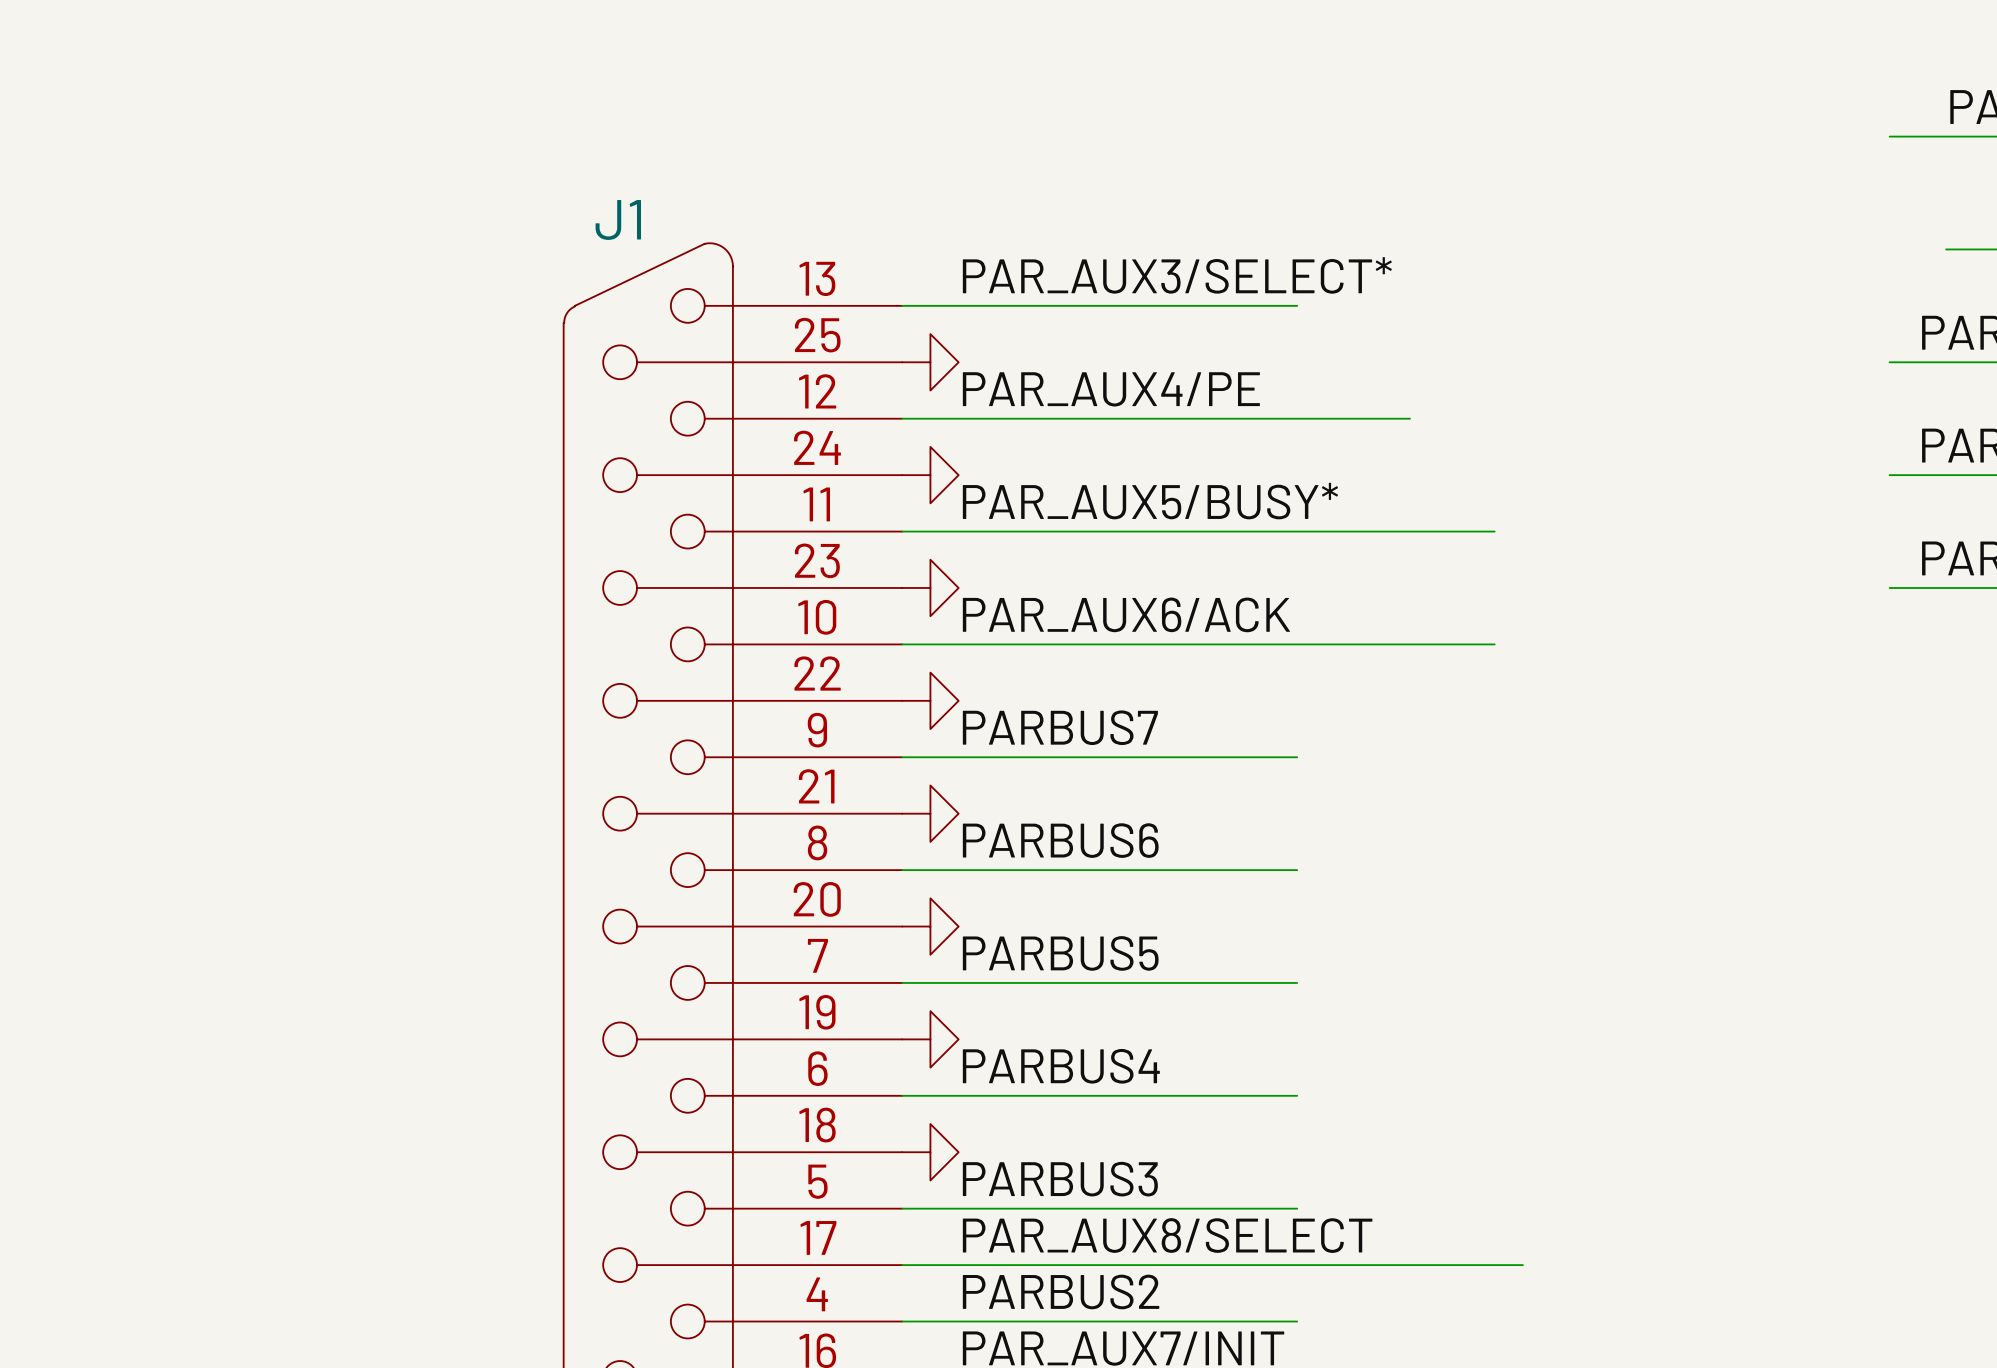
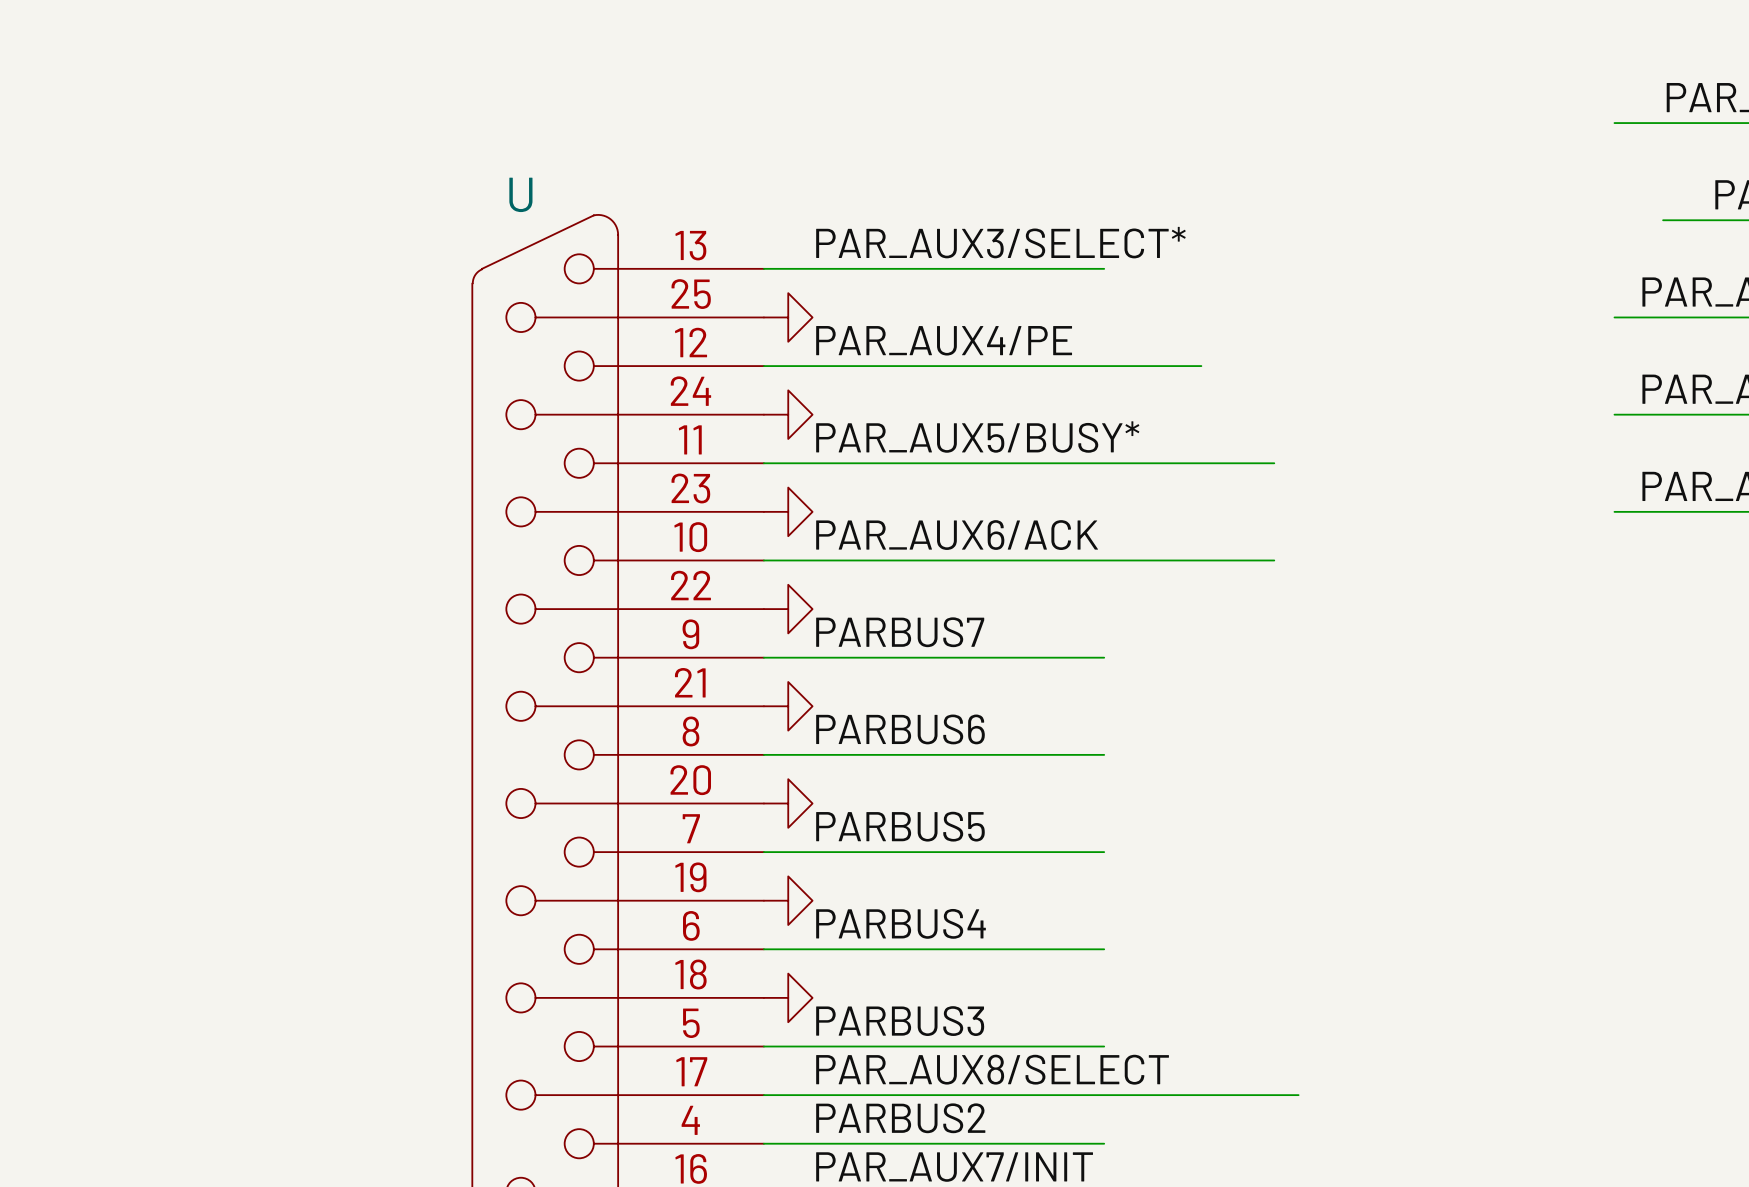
J1 name: J1 (618, 219) -> U (520, 194)

